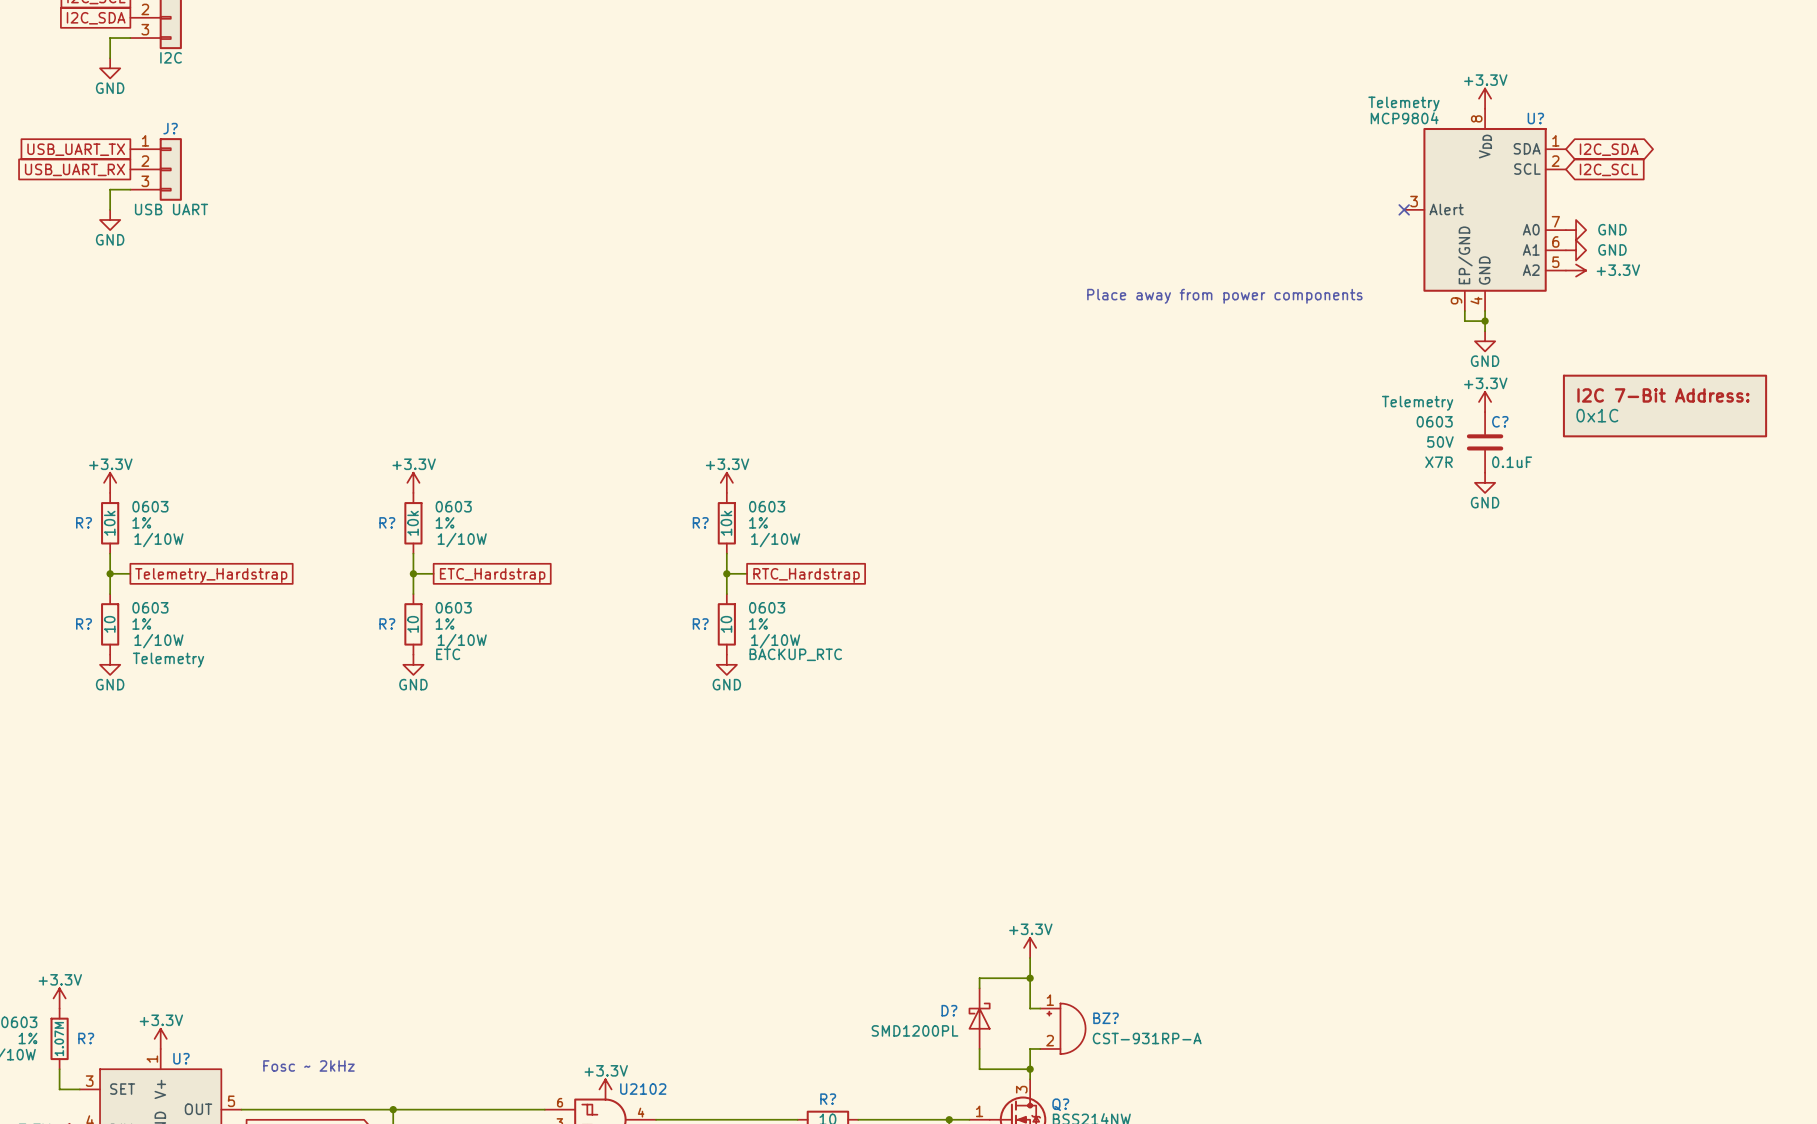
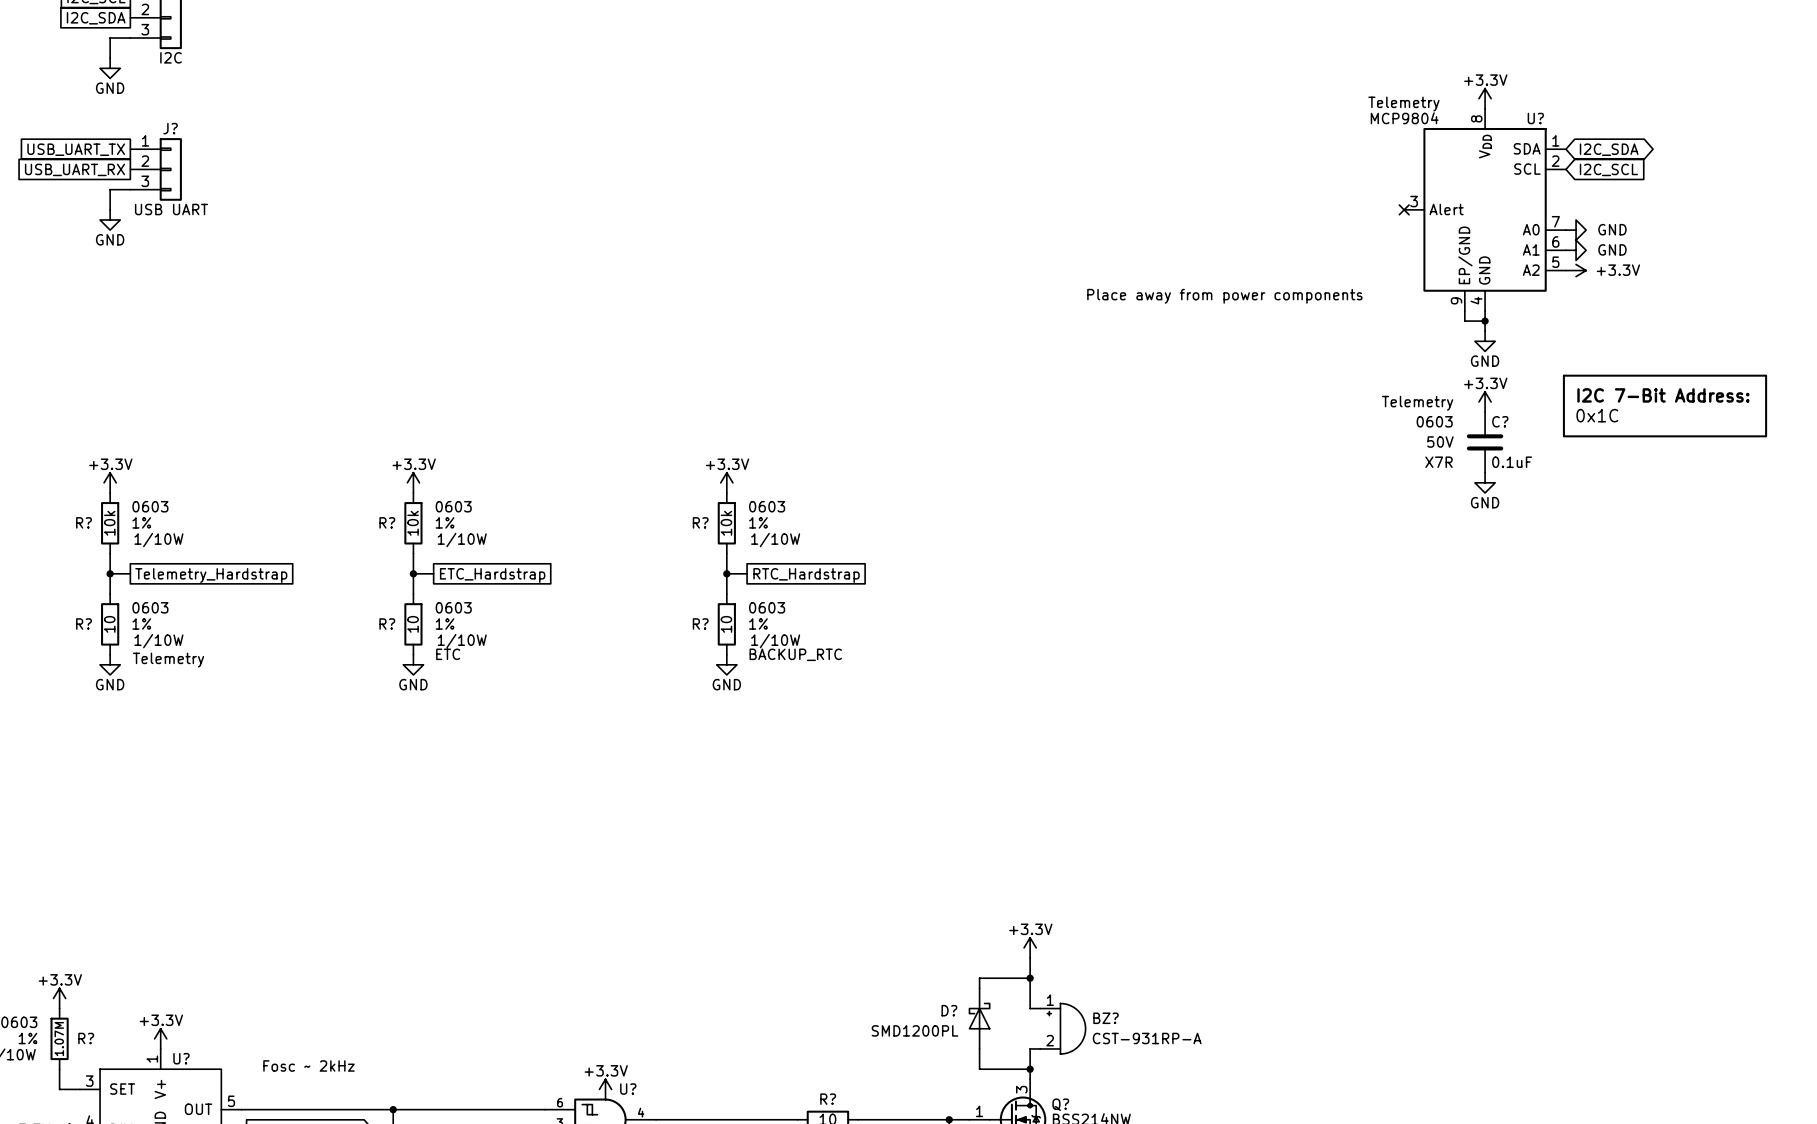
U2102 name: U2102 (643, 1089) -> U? (628, 1089)

